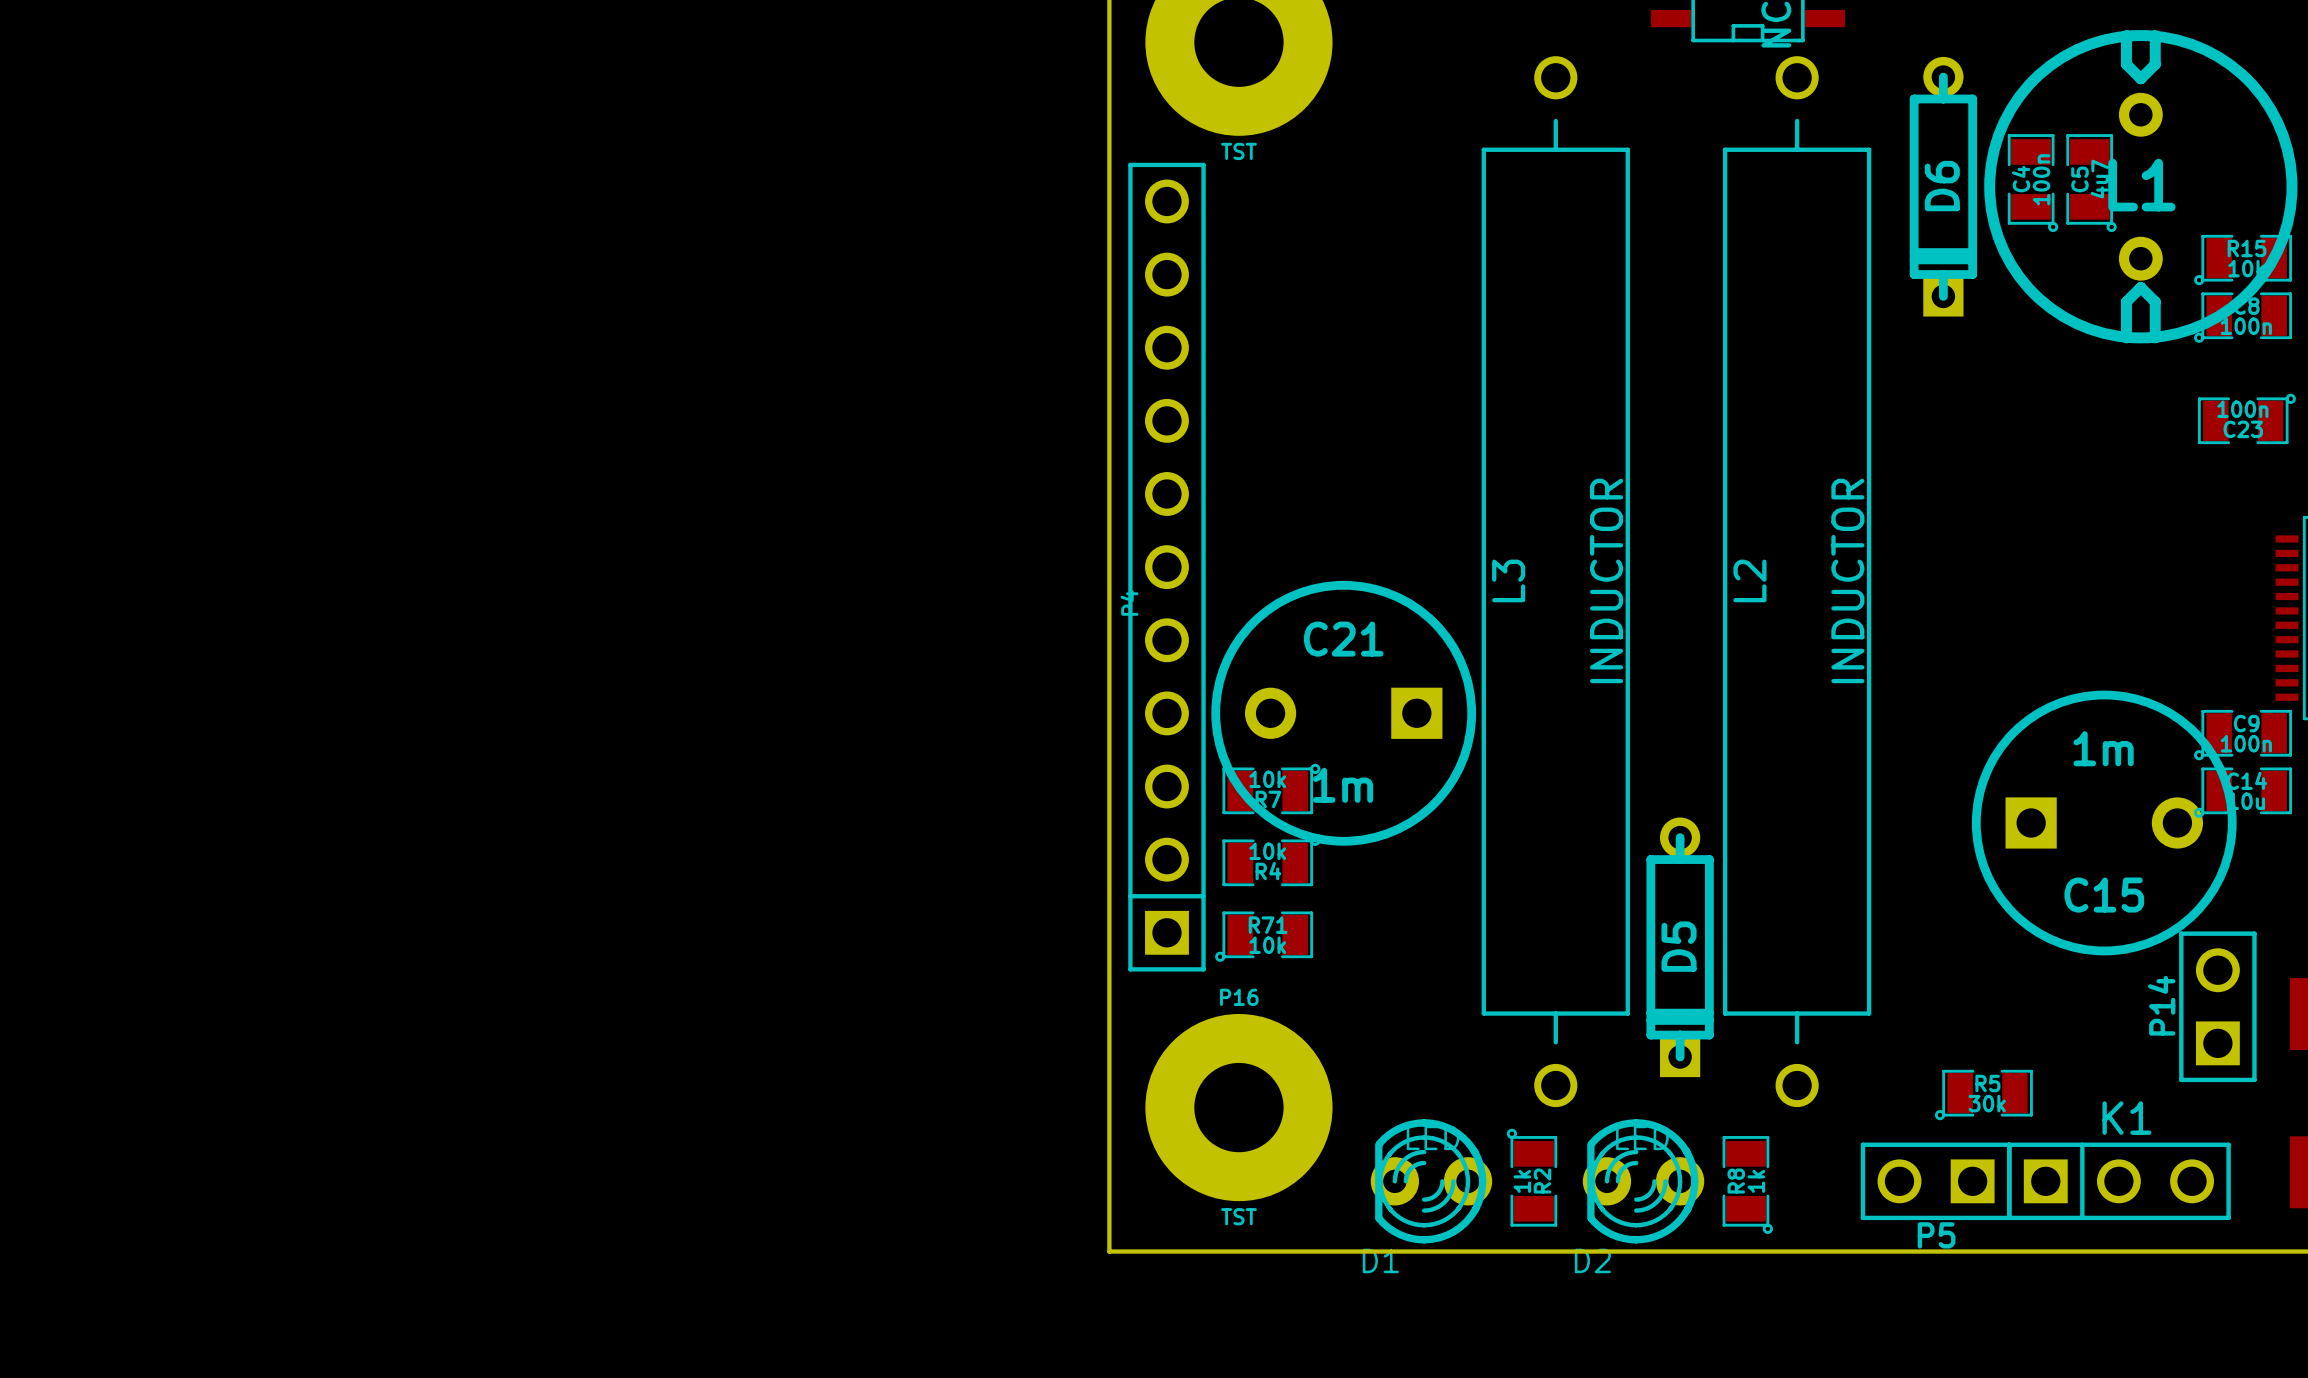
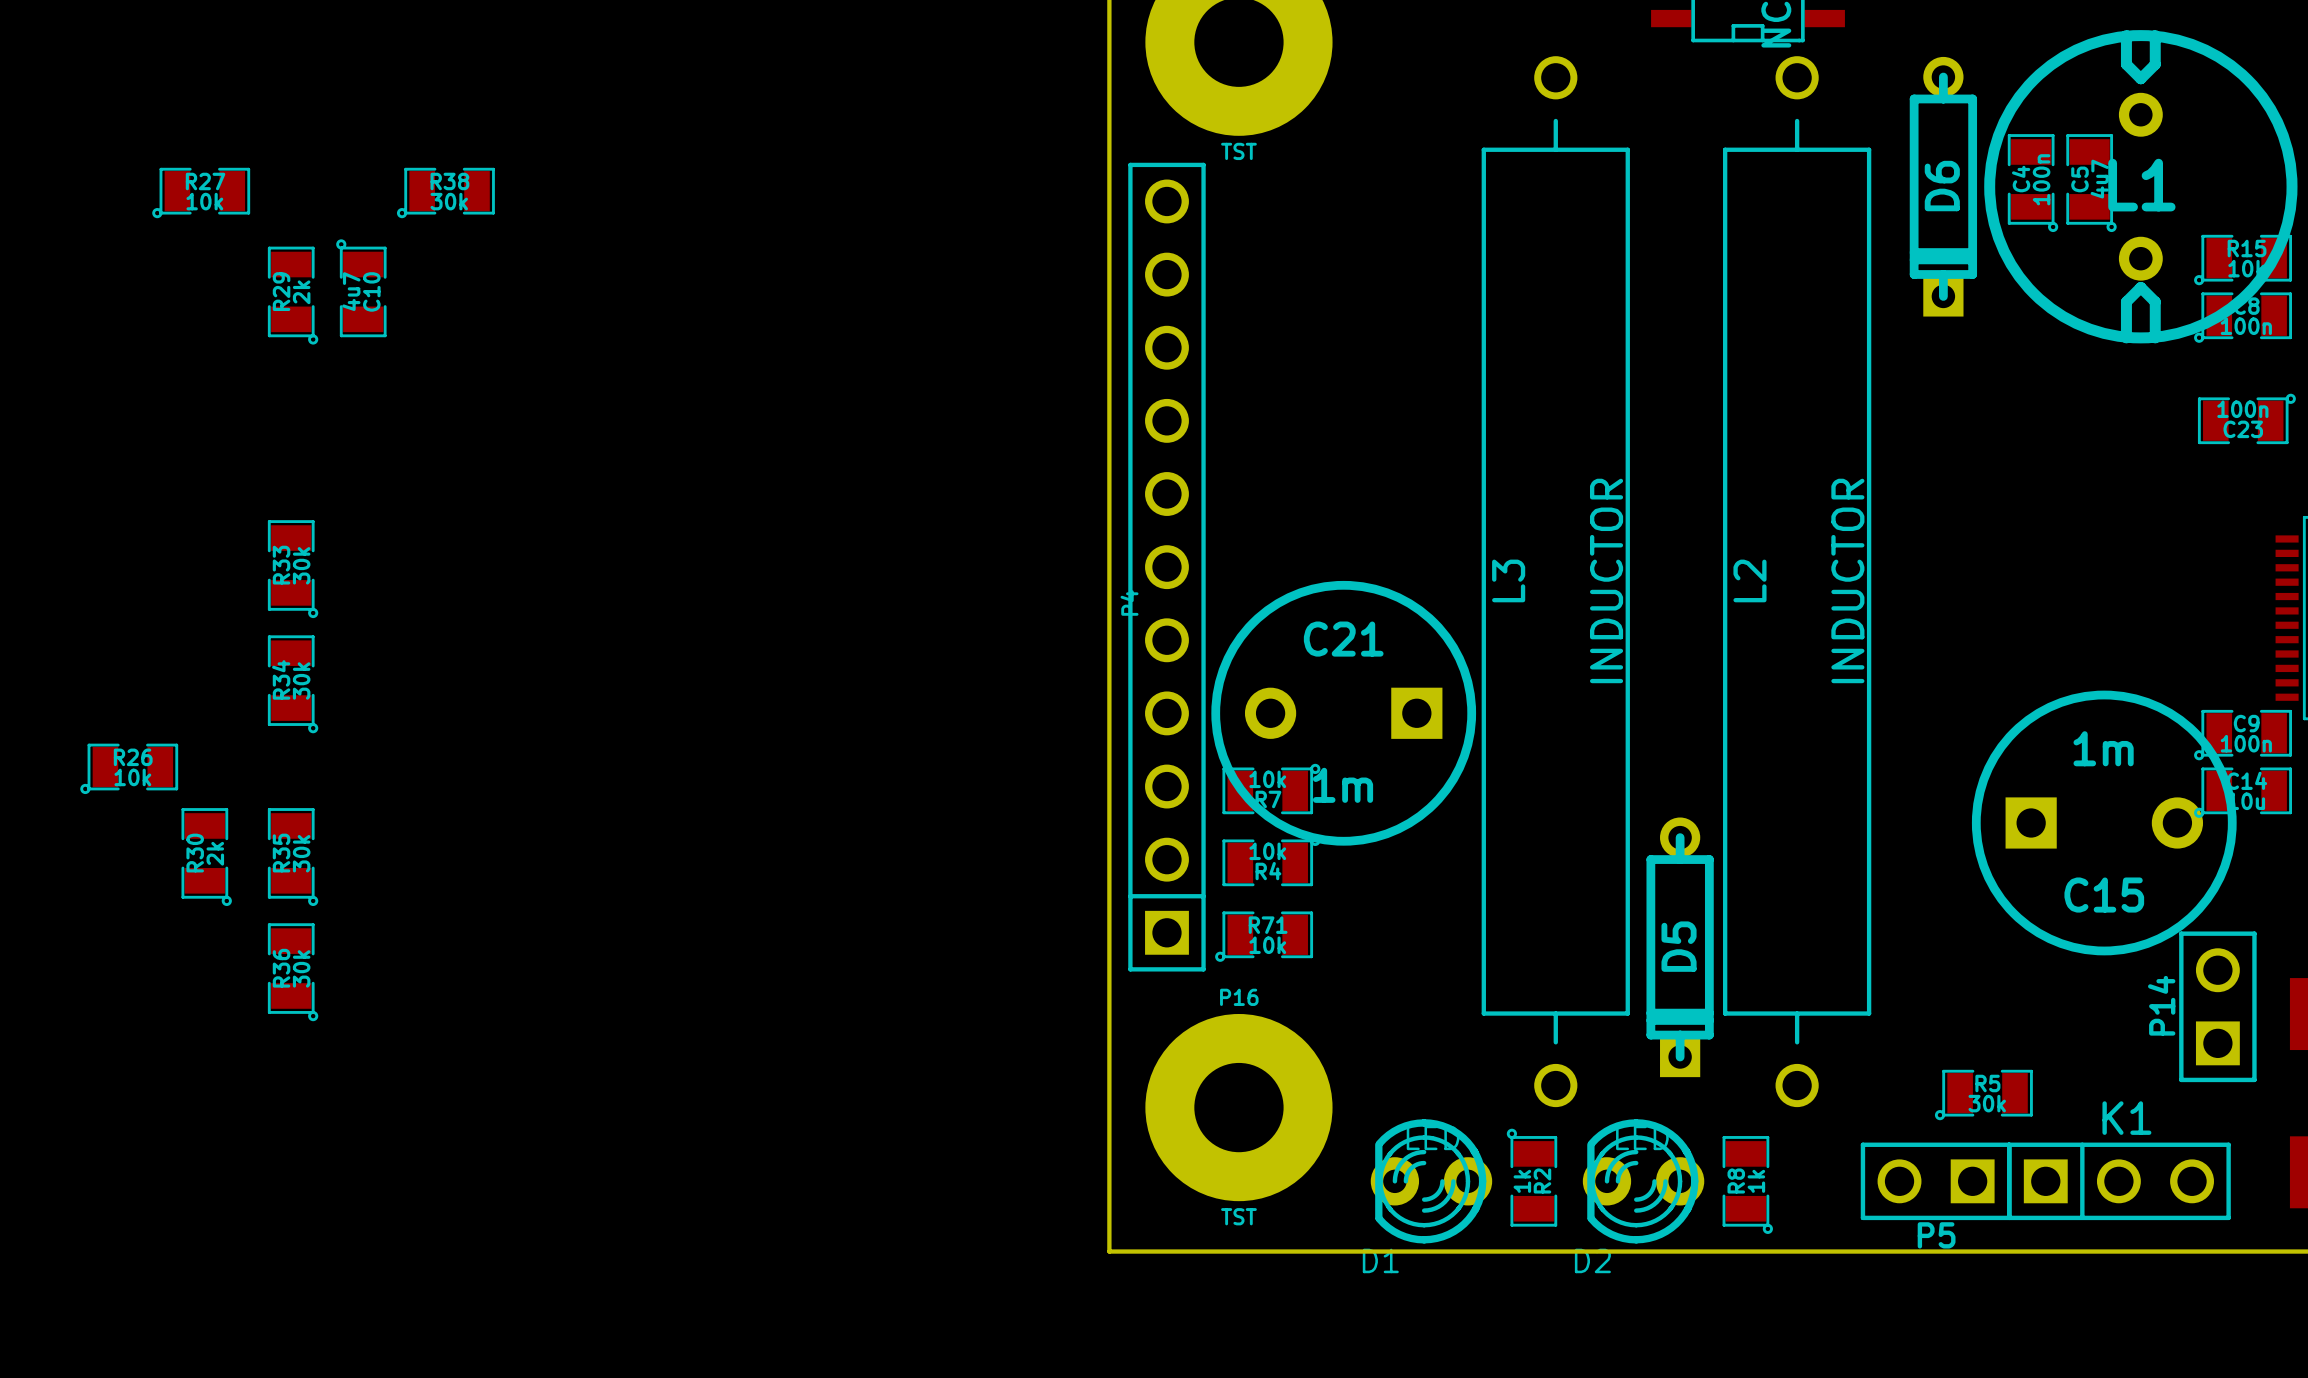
R27: none -> 10k (201, 192)
R38: none -> 30k (445, 192)
C10: none -> 4u7 (361, 288)
R29: none -> 2k (293, 295)
R33: none -> 30k (293, 569)
R34: none -> 30k (293, 684)
R26: none -> 10k (129, 768)
R30: none -> 2k (206, 857)
R35: none -> 30k (293, 857)
R36: none -> 30k (293, 972)

